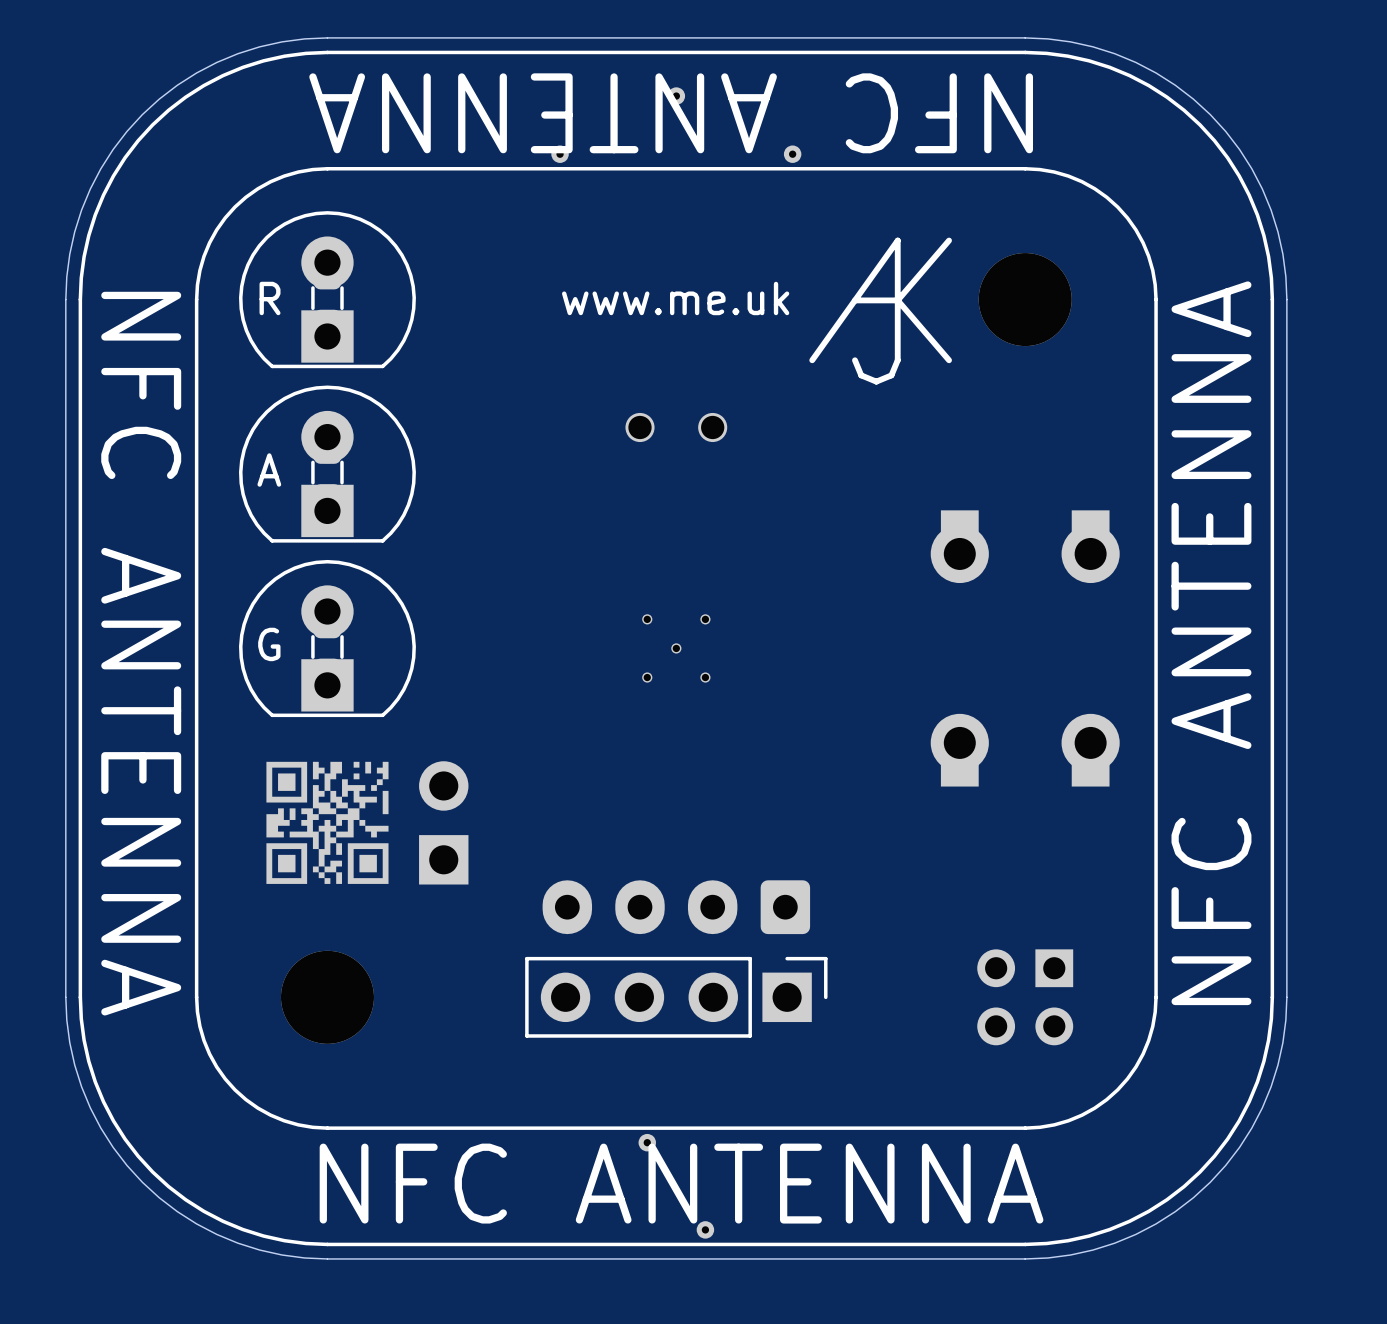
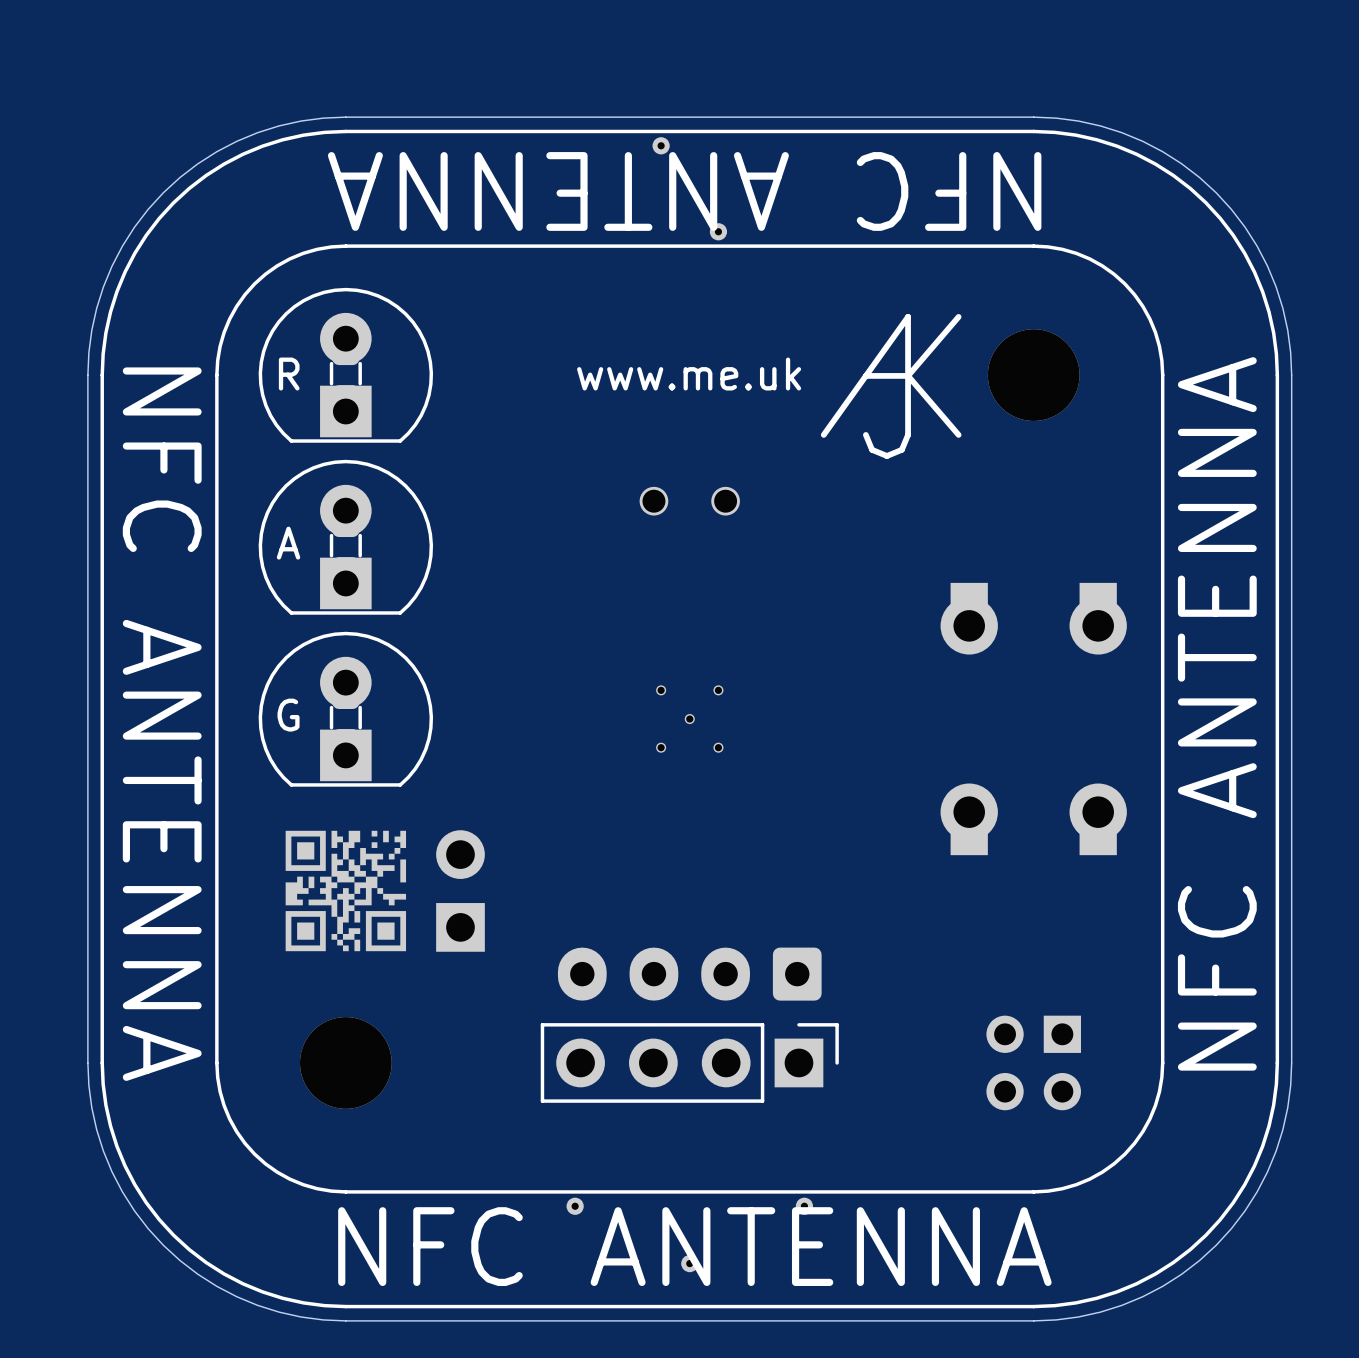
part rotation: 0° (676, 648) -> 180° (689, 719)

